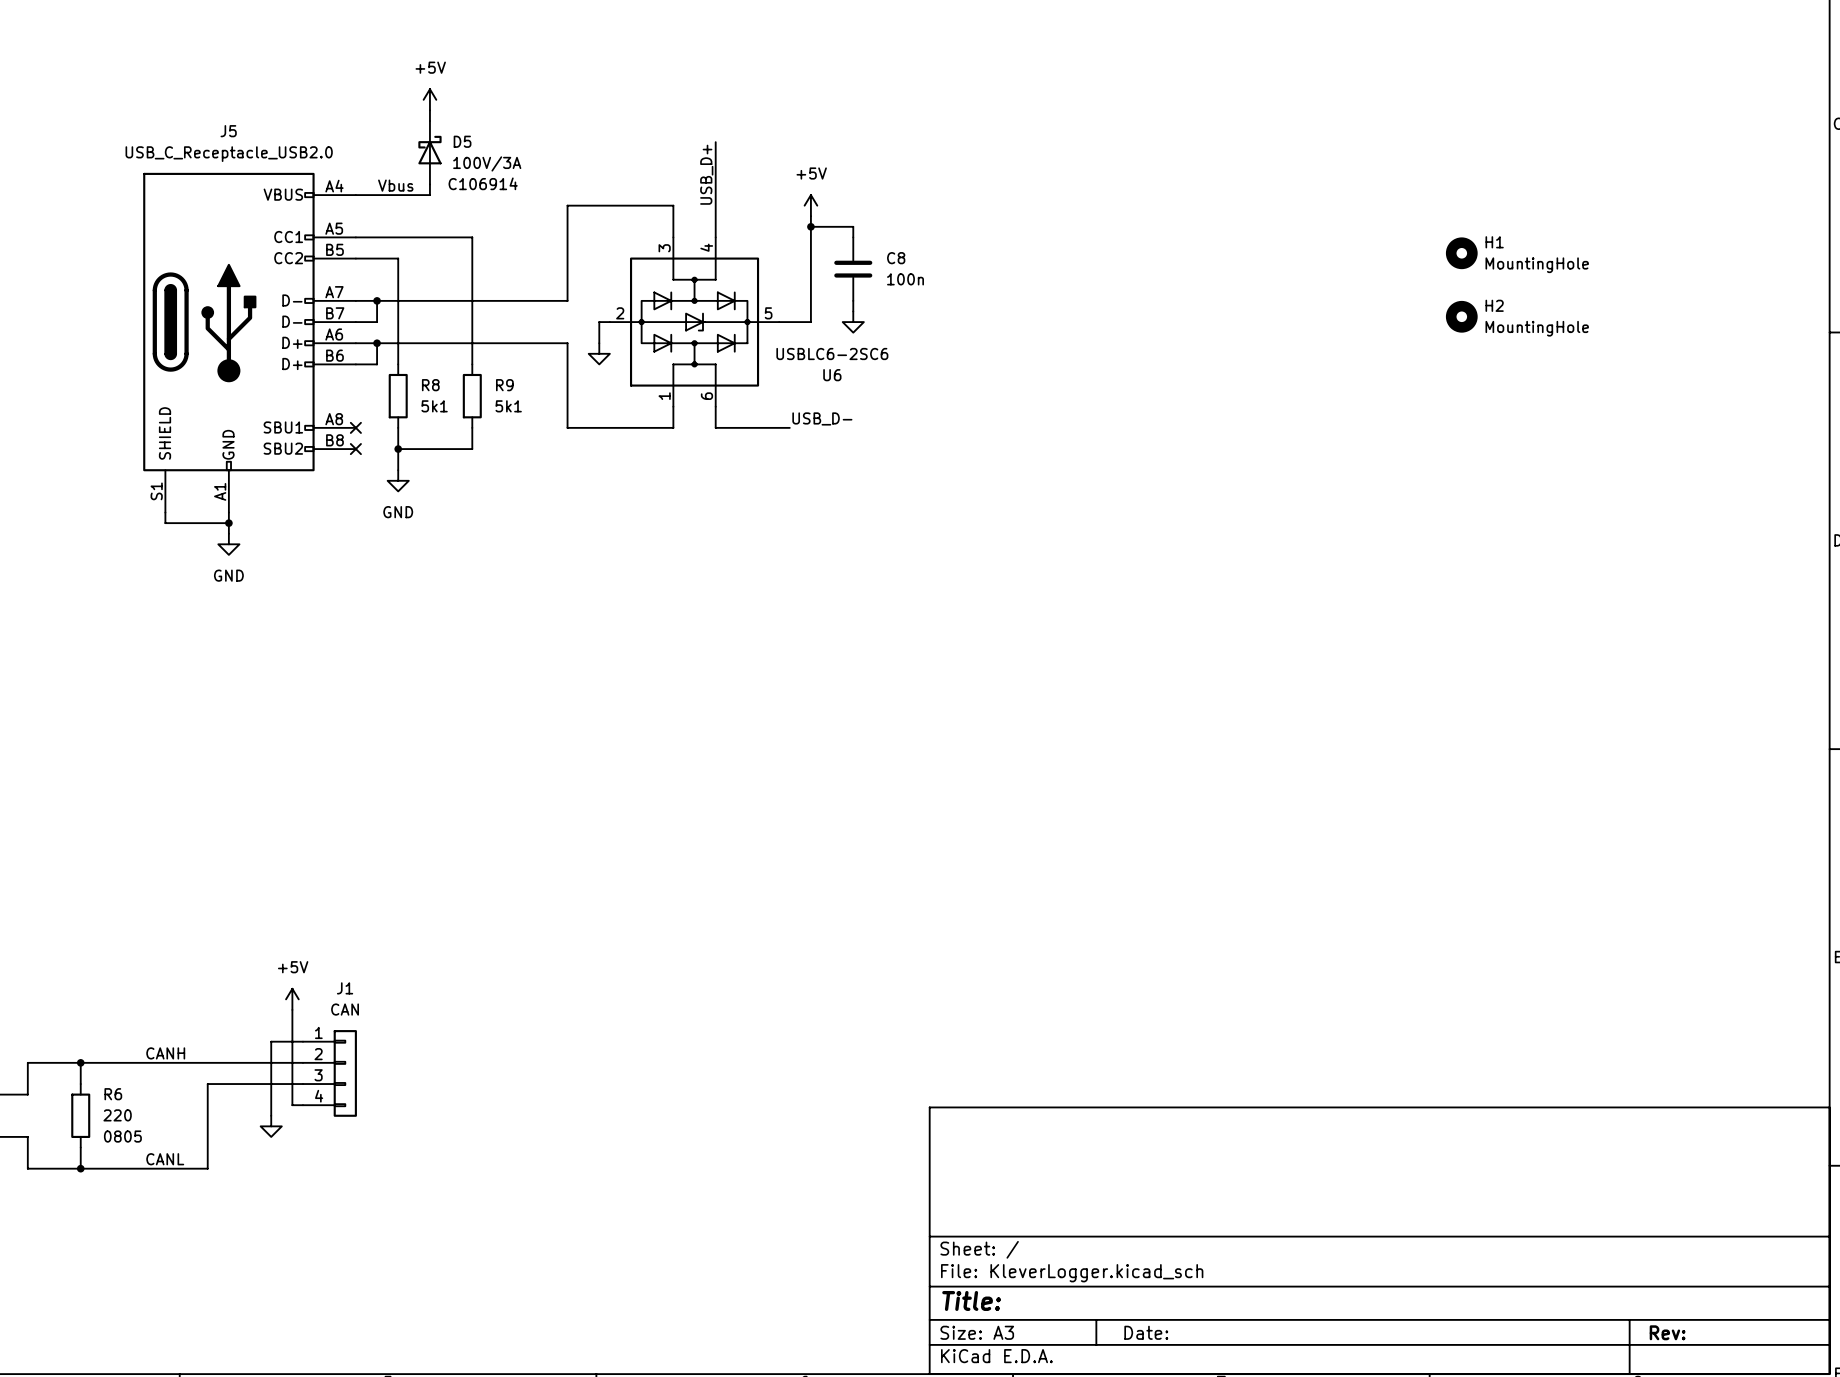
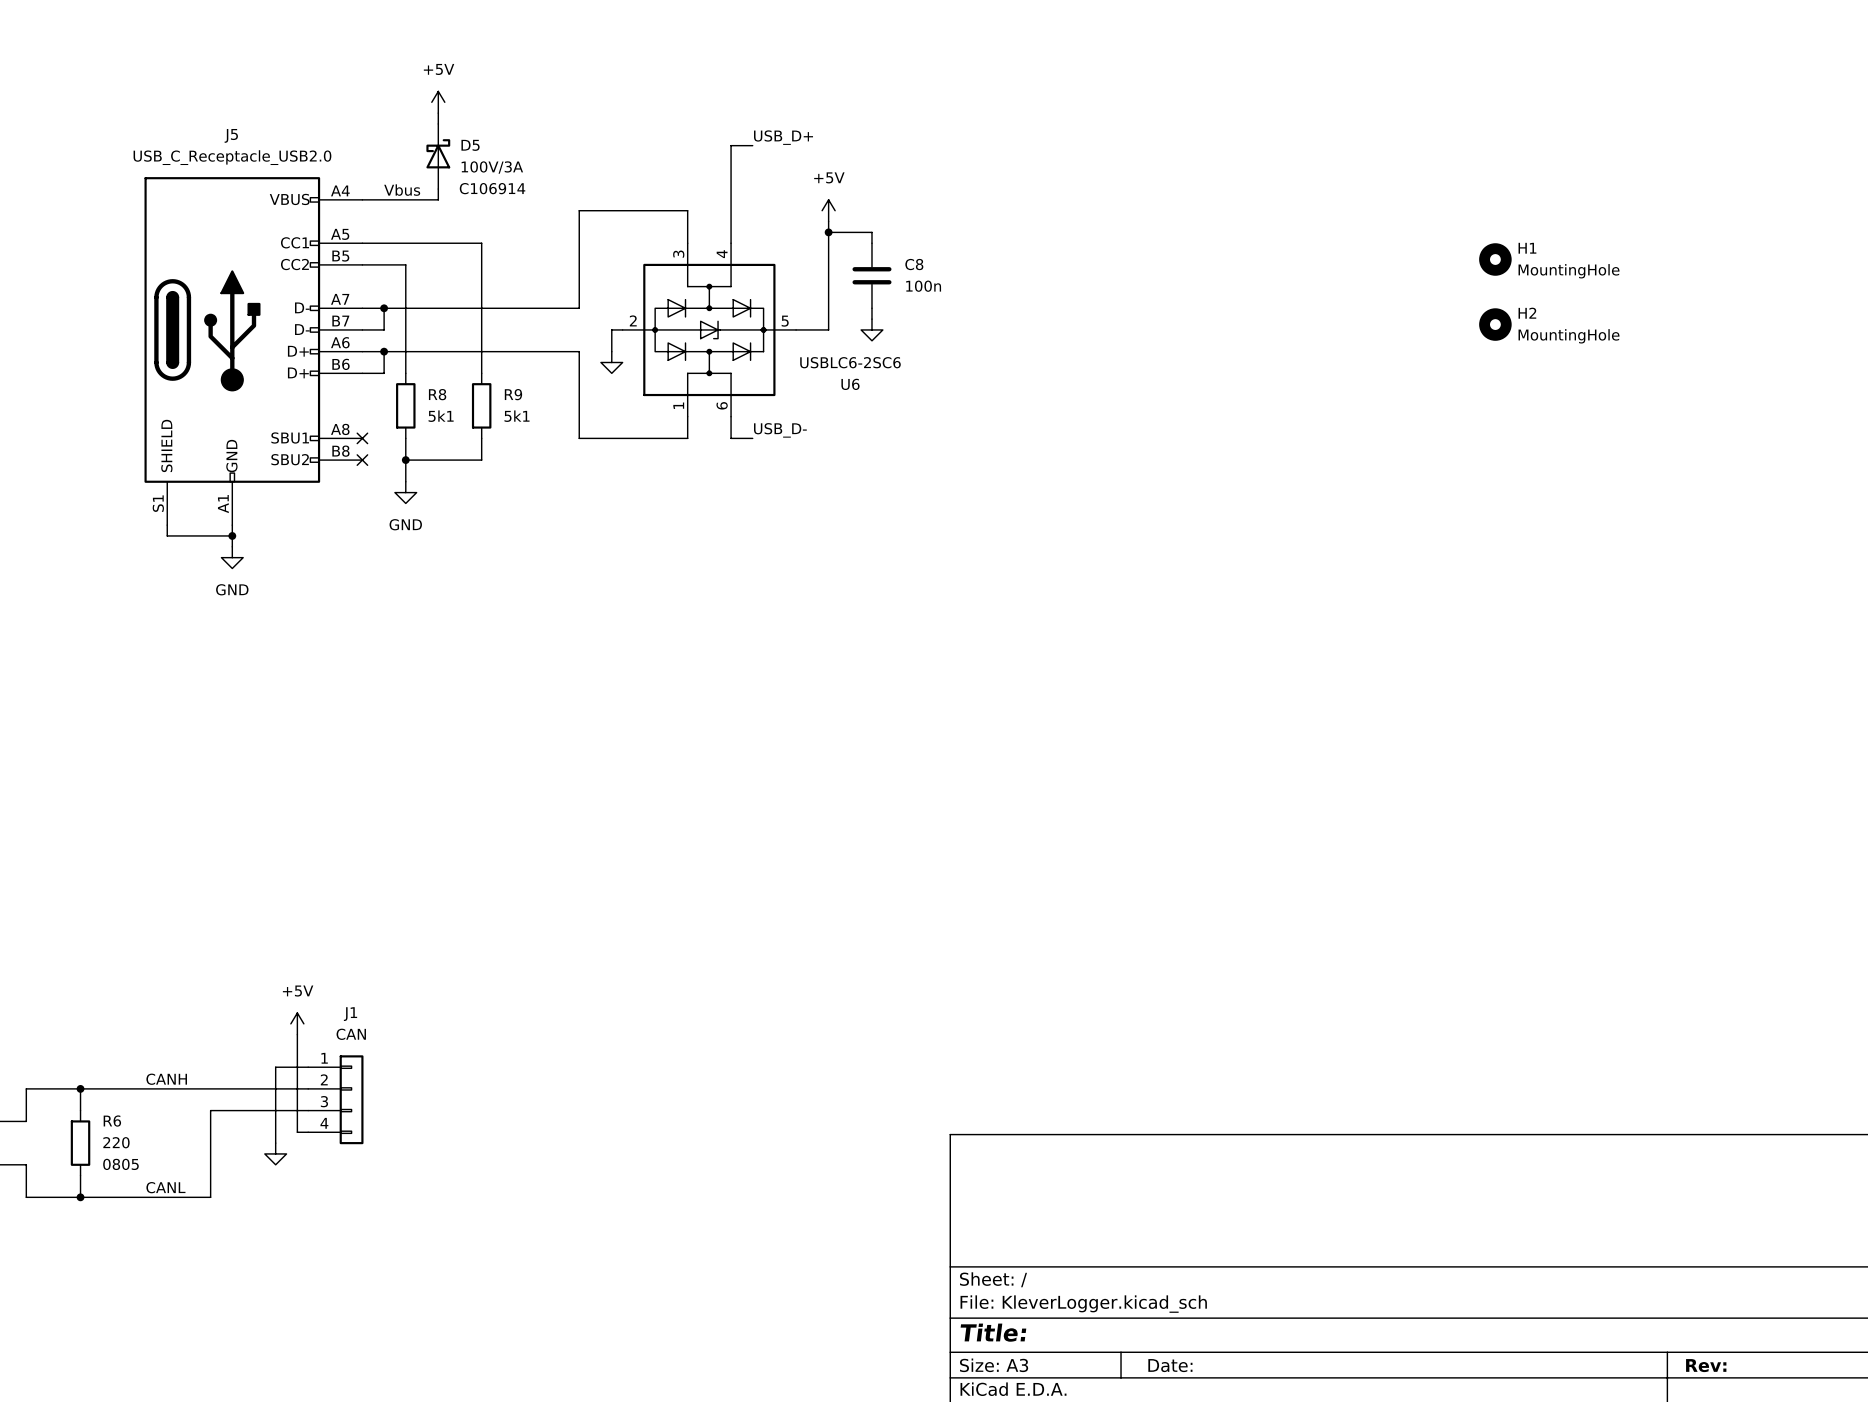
wire: none -> (731, 145) (752, 145)
label rotation: 0° (706, 174) -> 90° clockwise (783, 137)
label position: USB_D+ (706, 174) -> USB_D+ (783, 137)
label position: USB_D- (822, 418) -> USB_D- (780, 430)
wire: (736, 427) (789, 427) -> none

